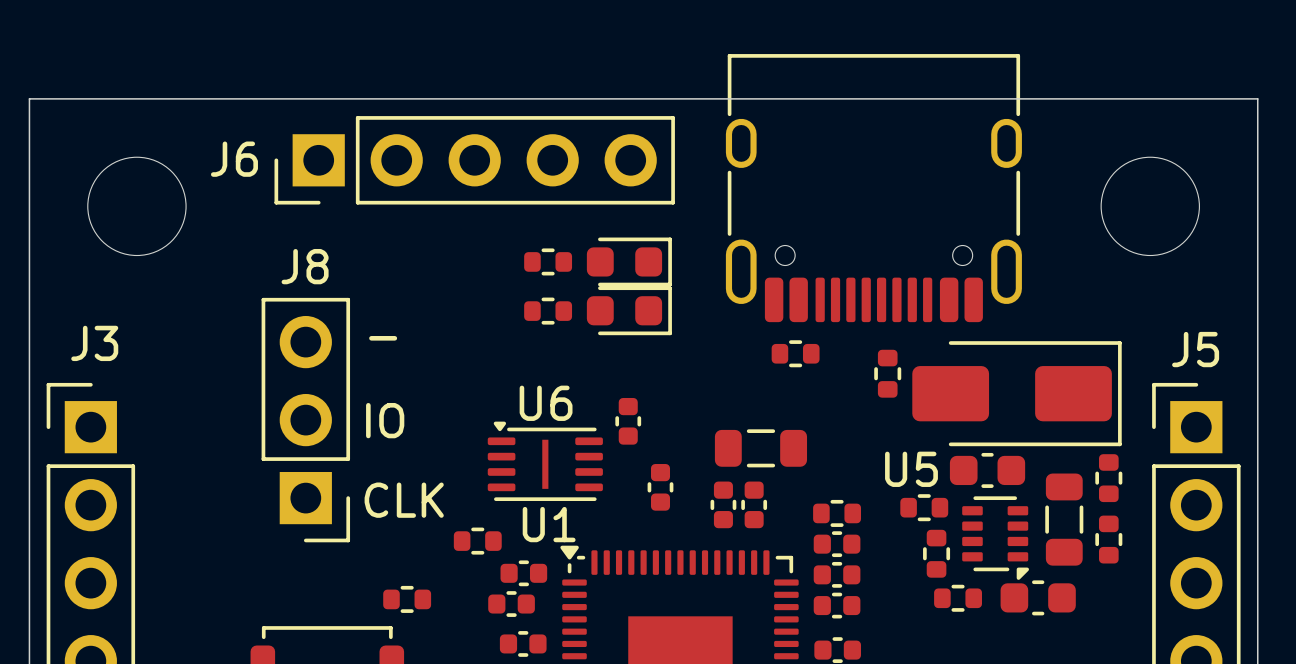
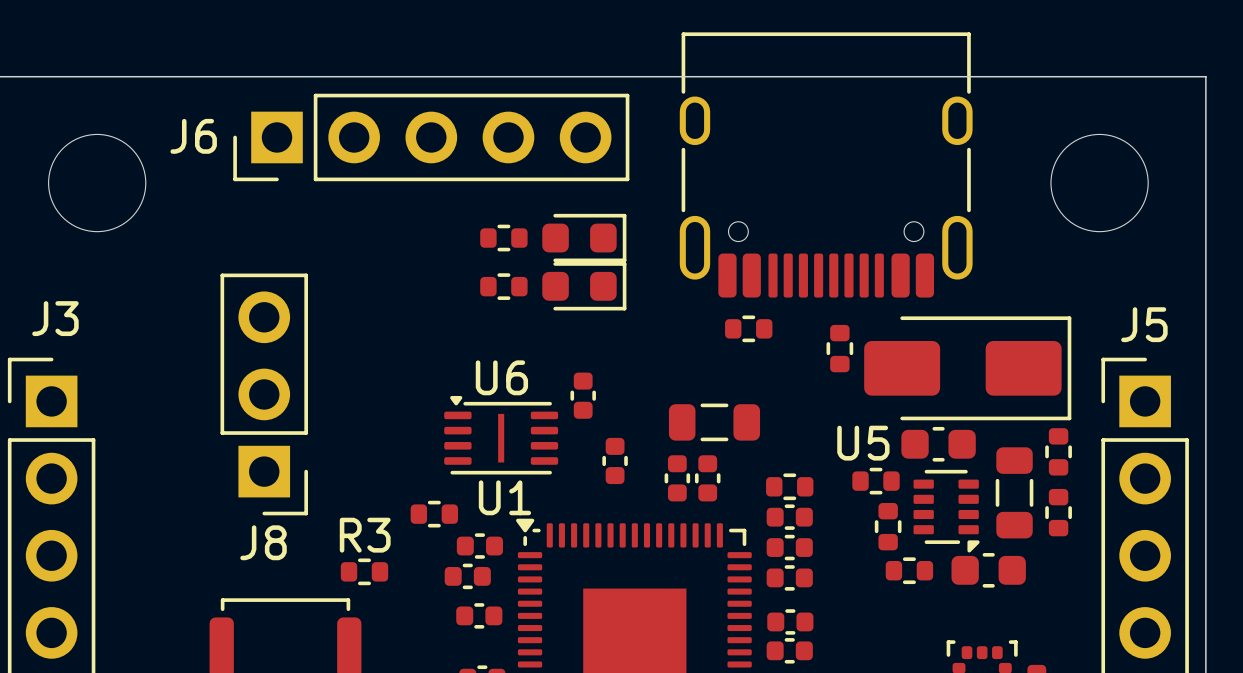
J8 name position: J8 (305, 266) -> J8 (263, 542)
text: - (383, 338) -> none
text: IO (385, 420) -> none
text: CLK (404, 500) -> none
R3 name: none -> R3 (365, 535)

